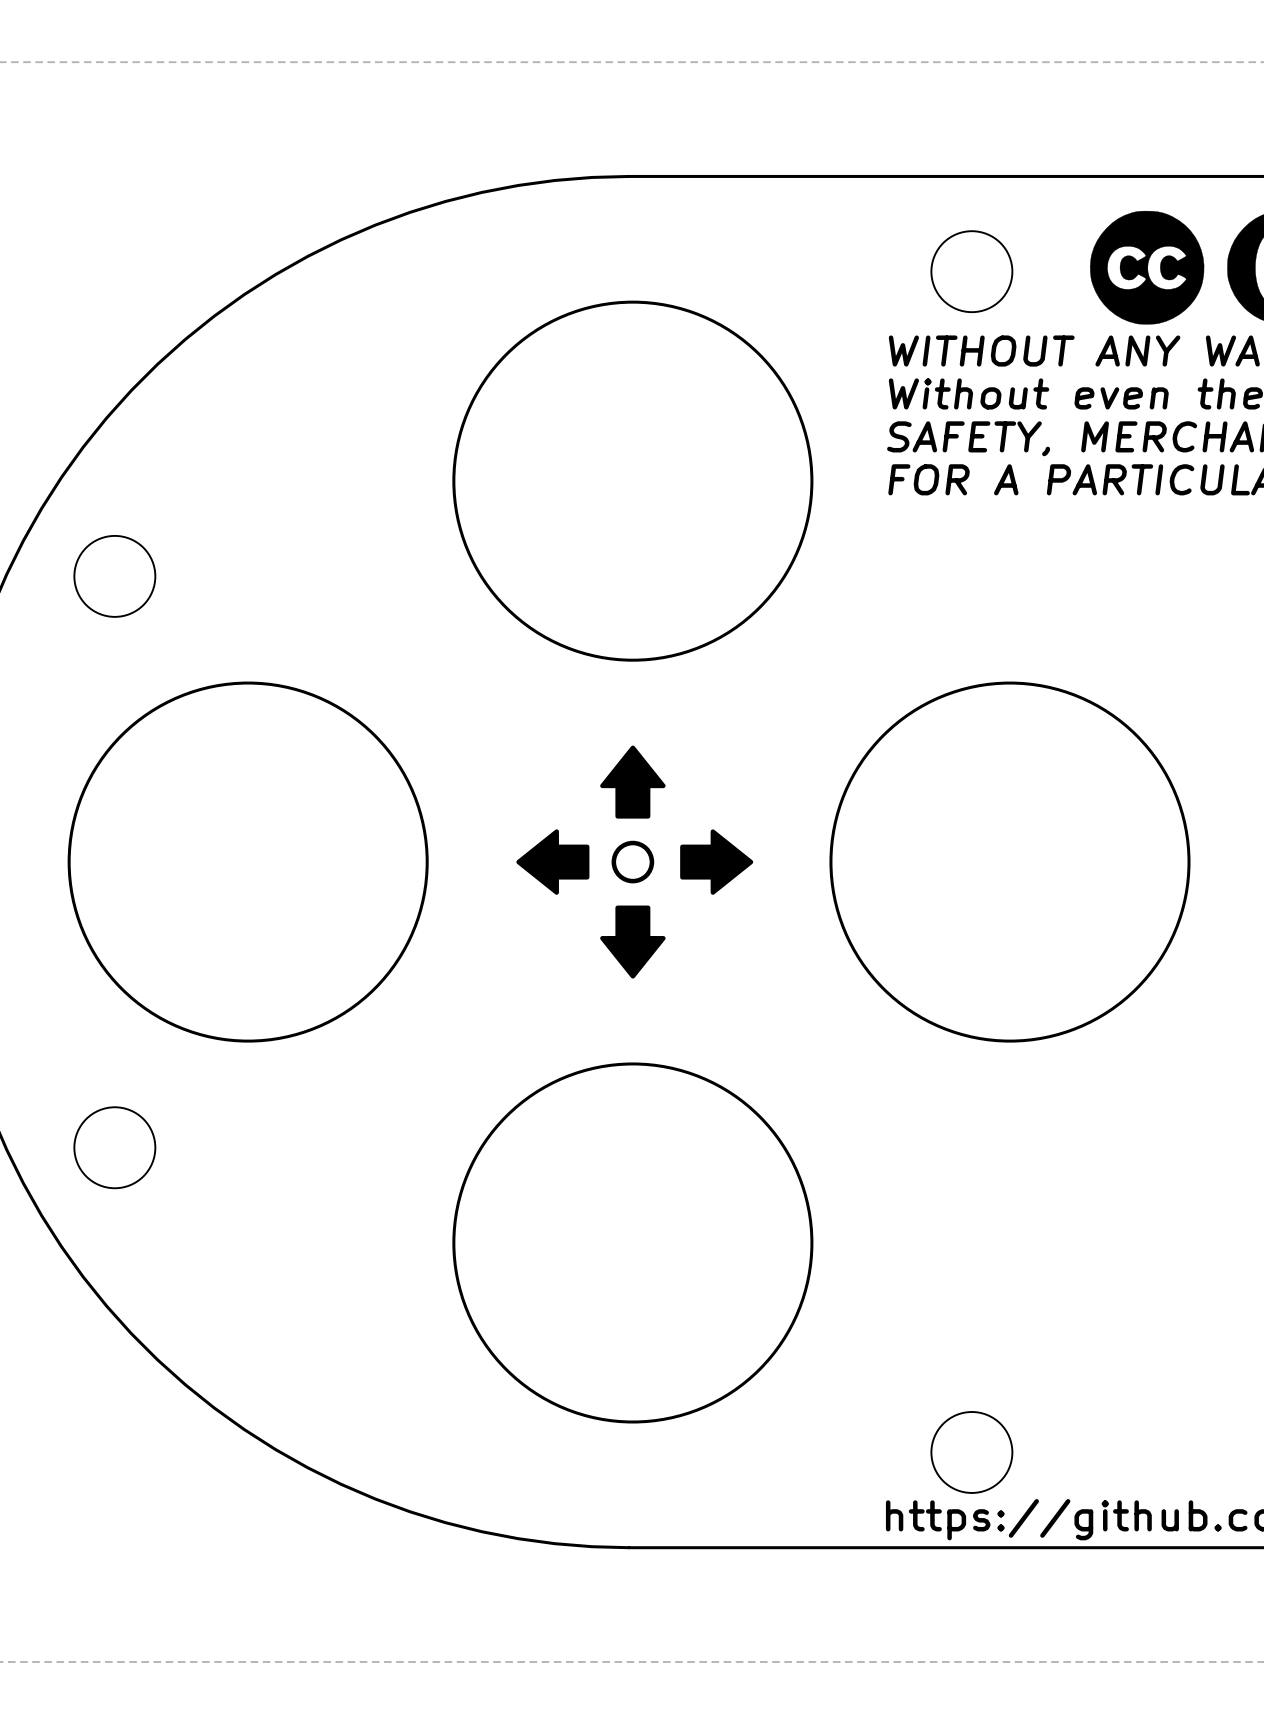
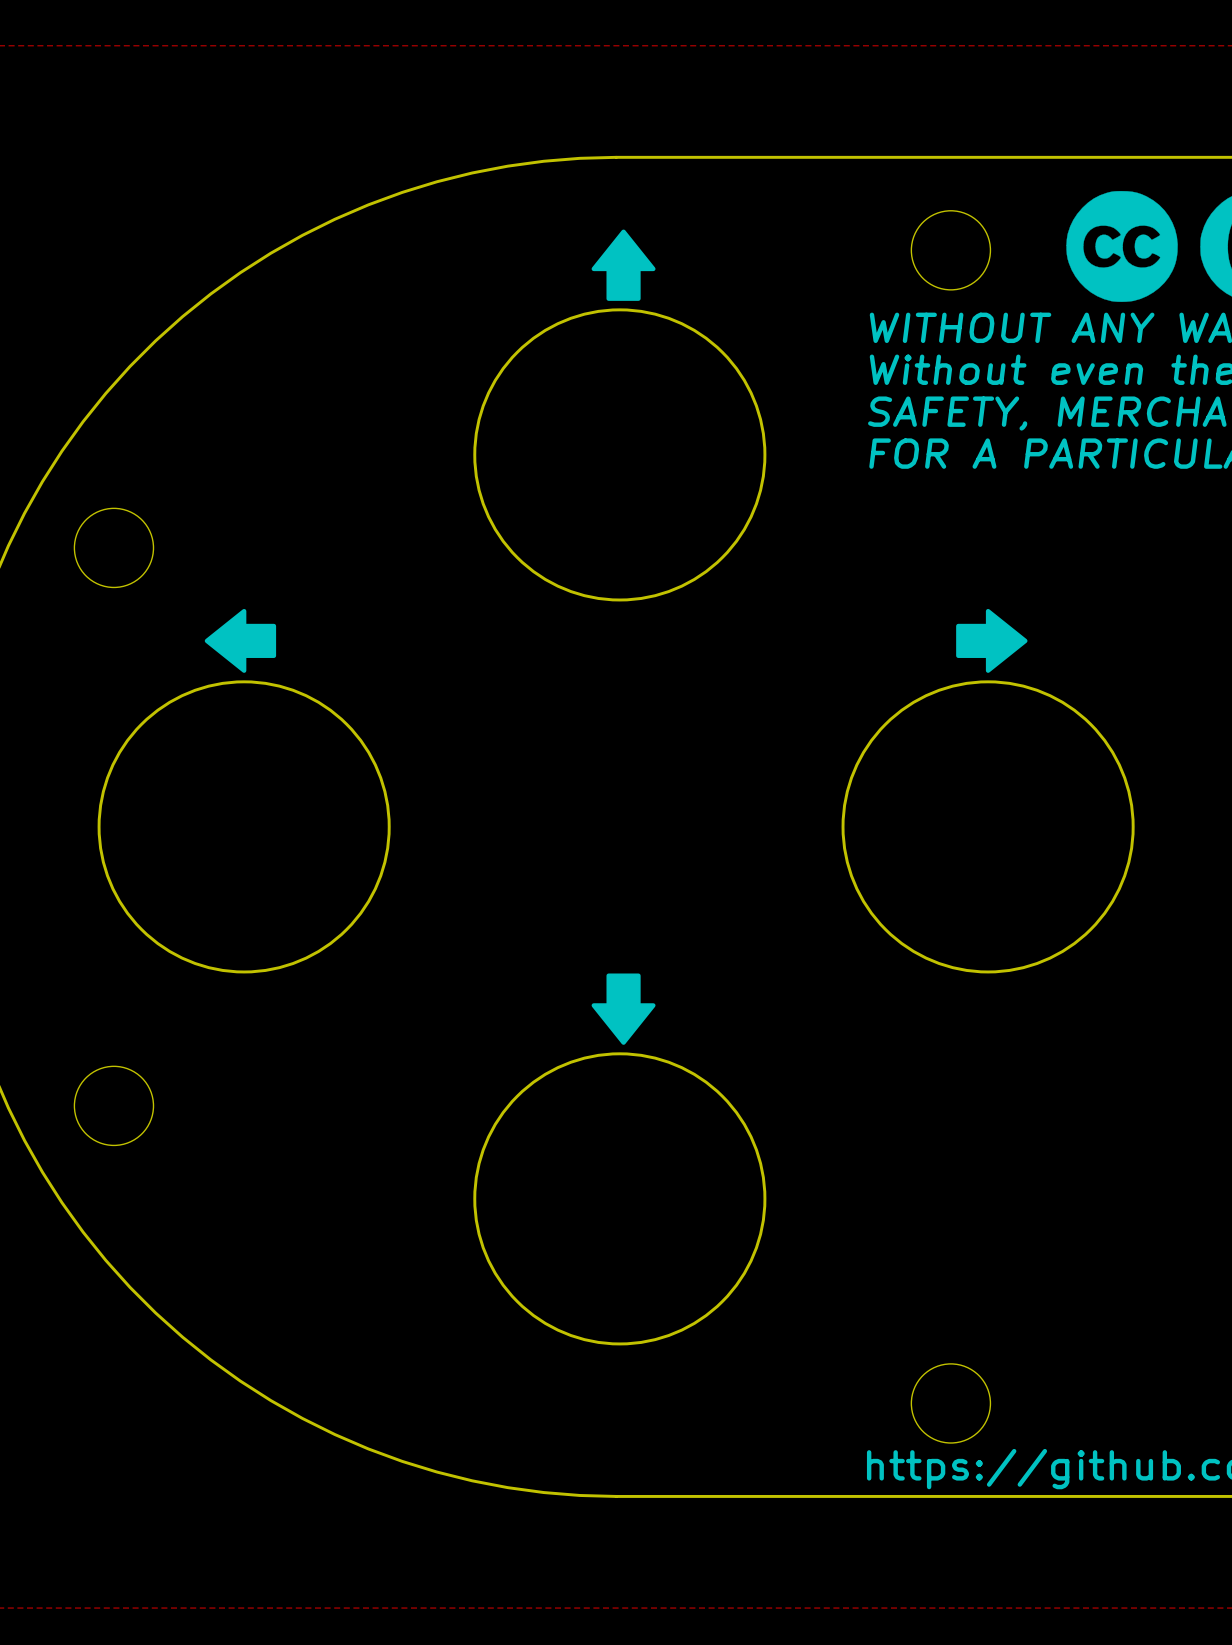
round board edge size: [452, 300, 814, 662] -> [473, 308, 767, 602]
round board edge size: [67, 681, 429, 1043] -> [97, 680, 391, 974]
round board edge size: [829, 681, 1191, 1043] -> [841, 680, 1135, 974]
drawing position: (632, 782) -> (623, 265)
drawing: [611, 840, 655, 884] -> none
drawing position: (552, 862) -> (240, 640)
drawing position: (716, 862) -> (991, 640)
drawing position: (632, 942) -> (623, 1009)
round board edge size: [452, 1062, 814, 1424] -> [473, 1052, 767, 1346]

